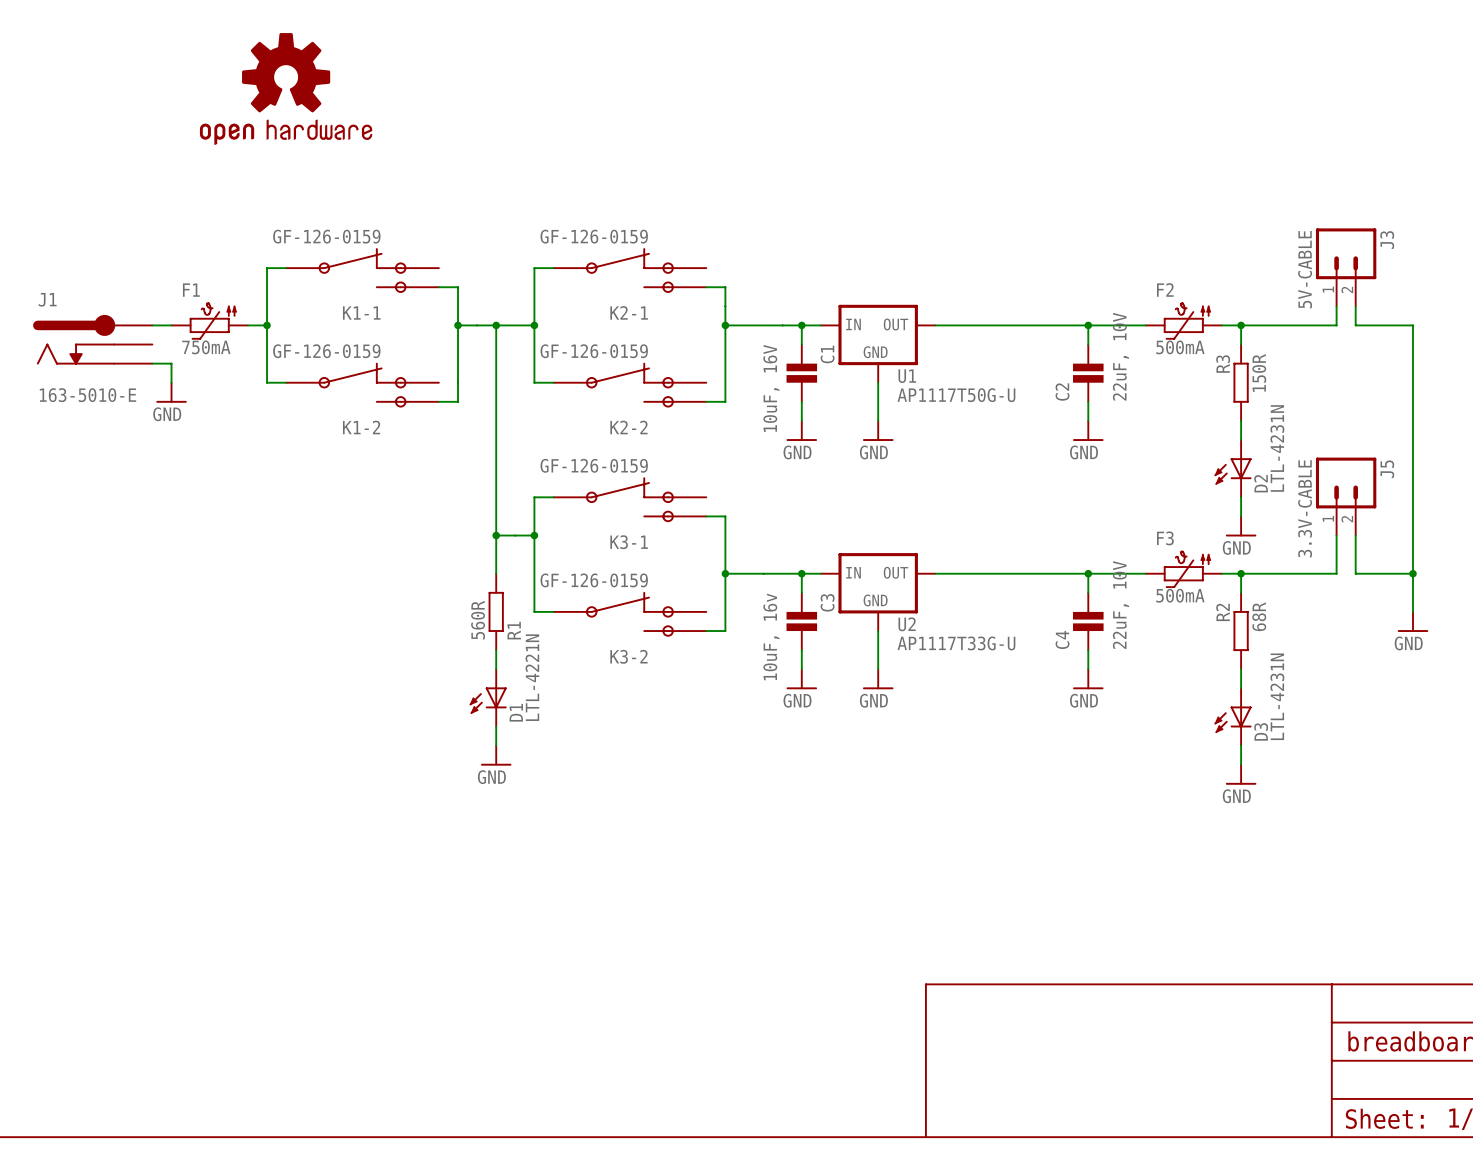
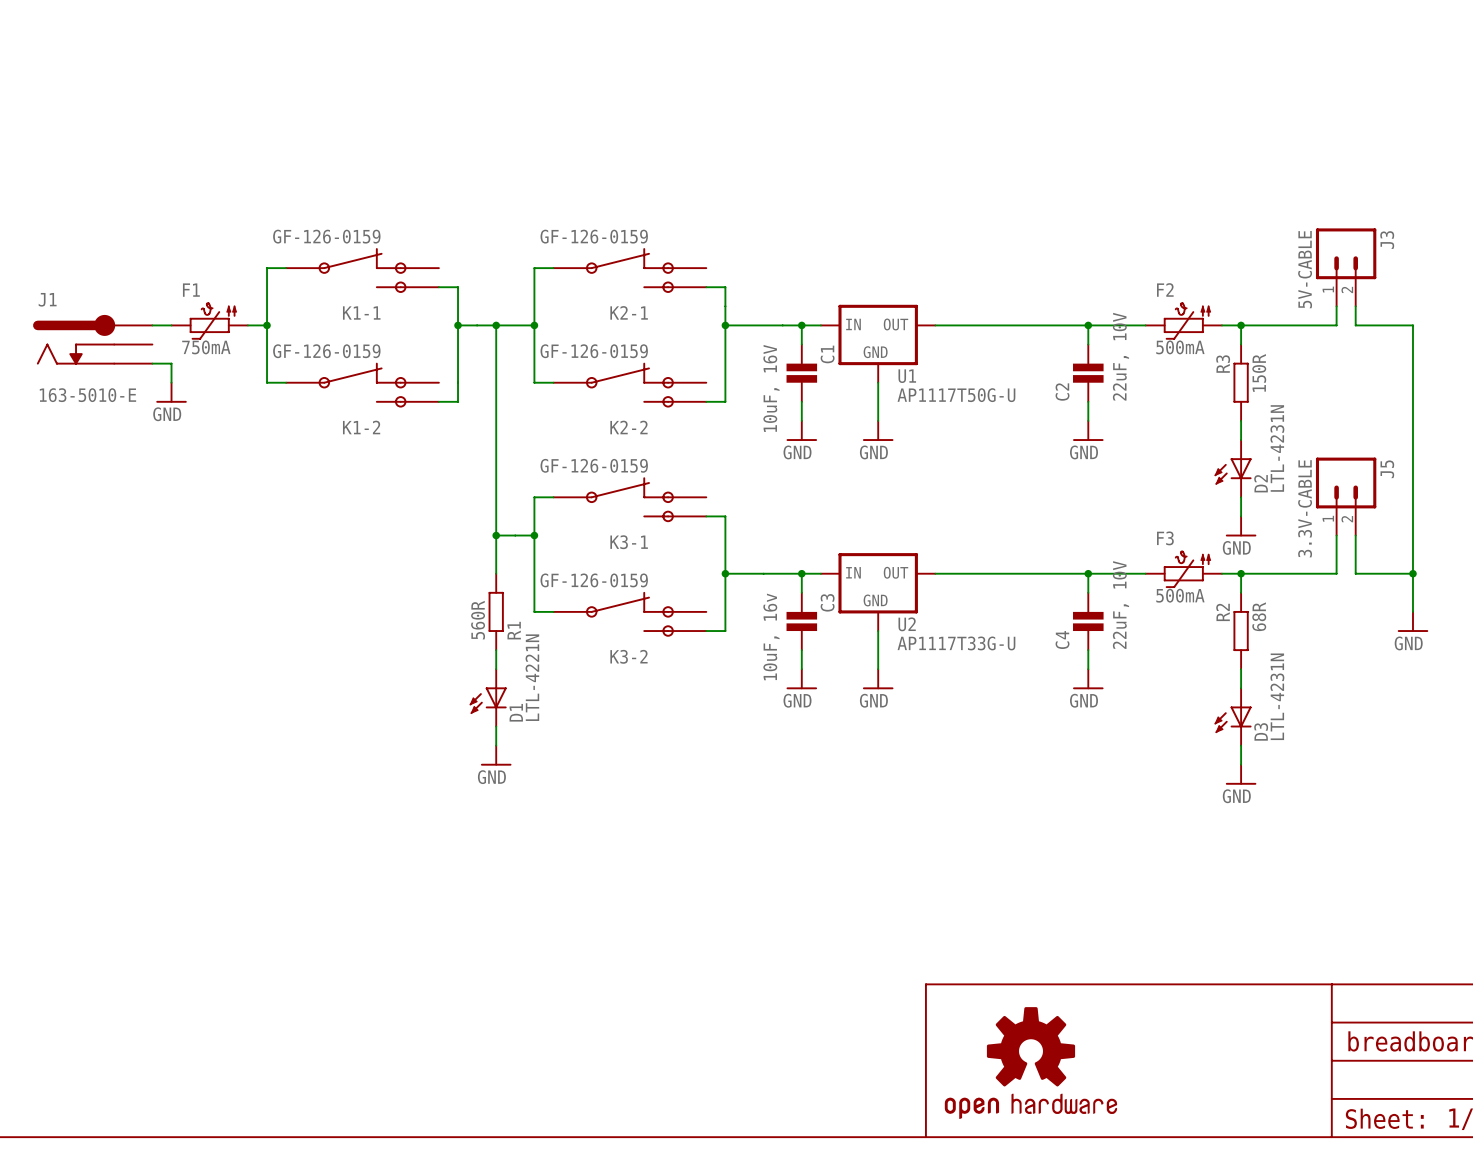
part: (286, 88) -> none
part: none -> (1030, 1063)

